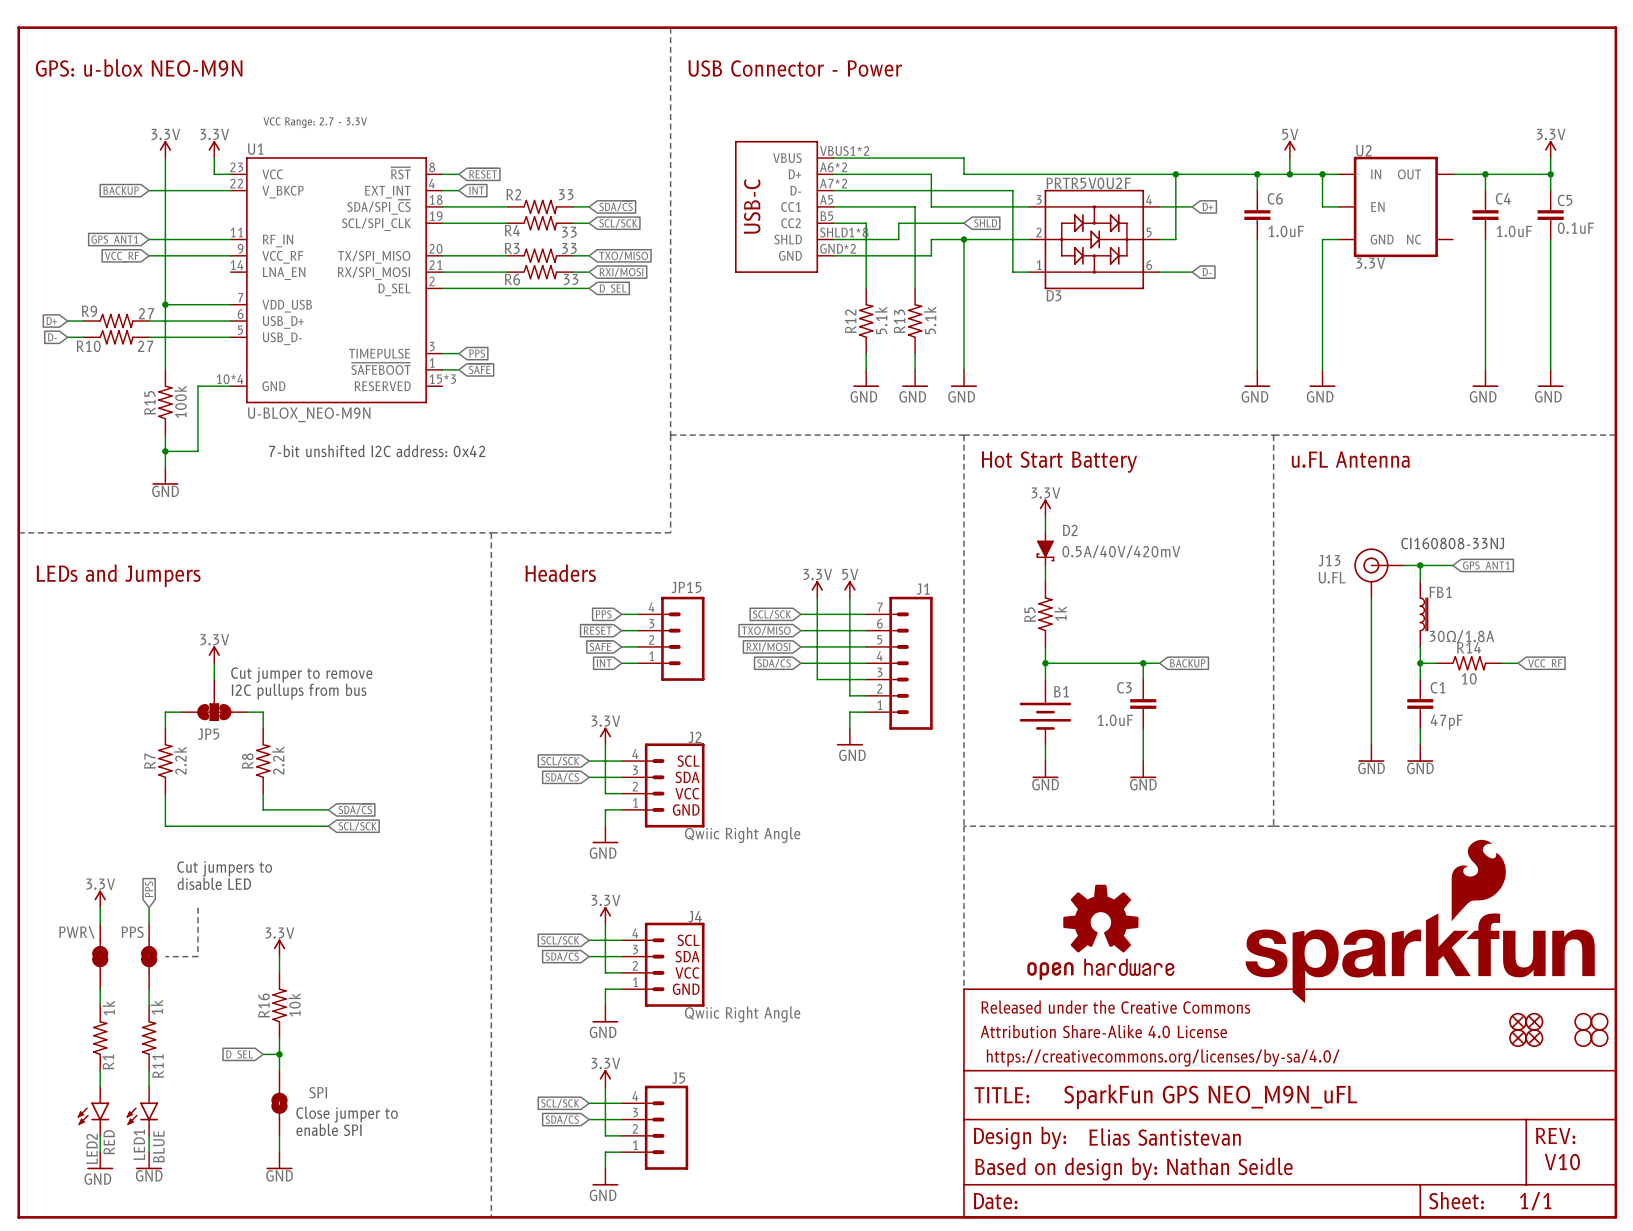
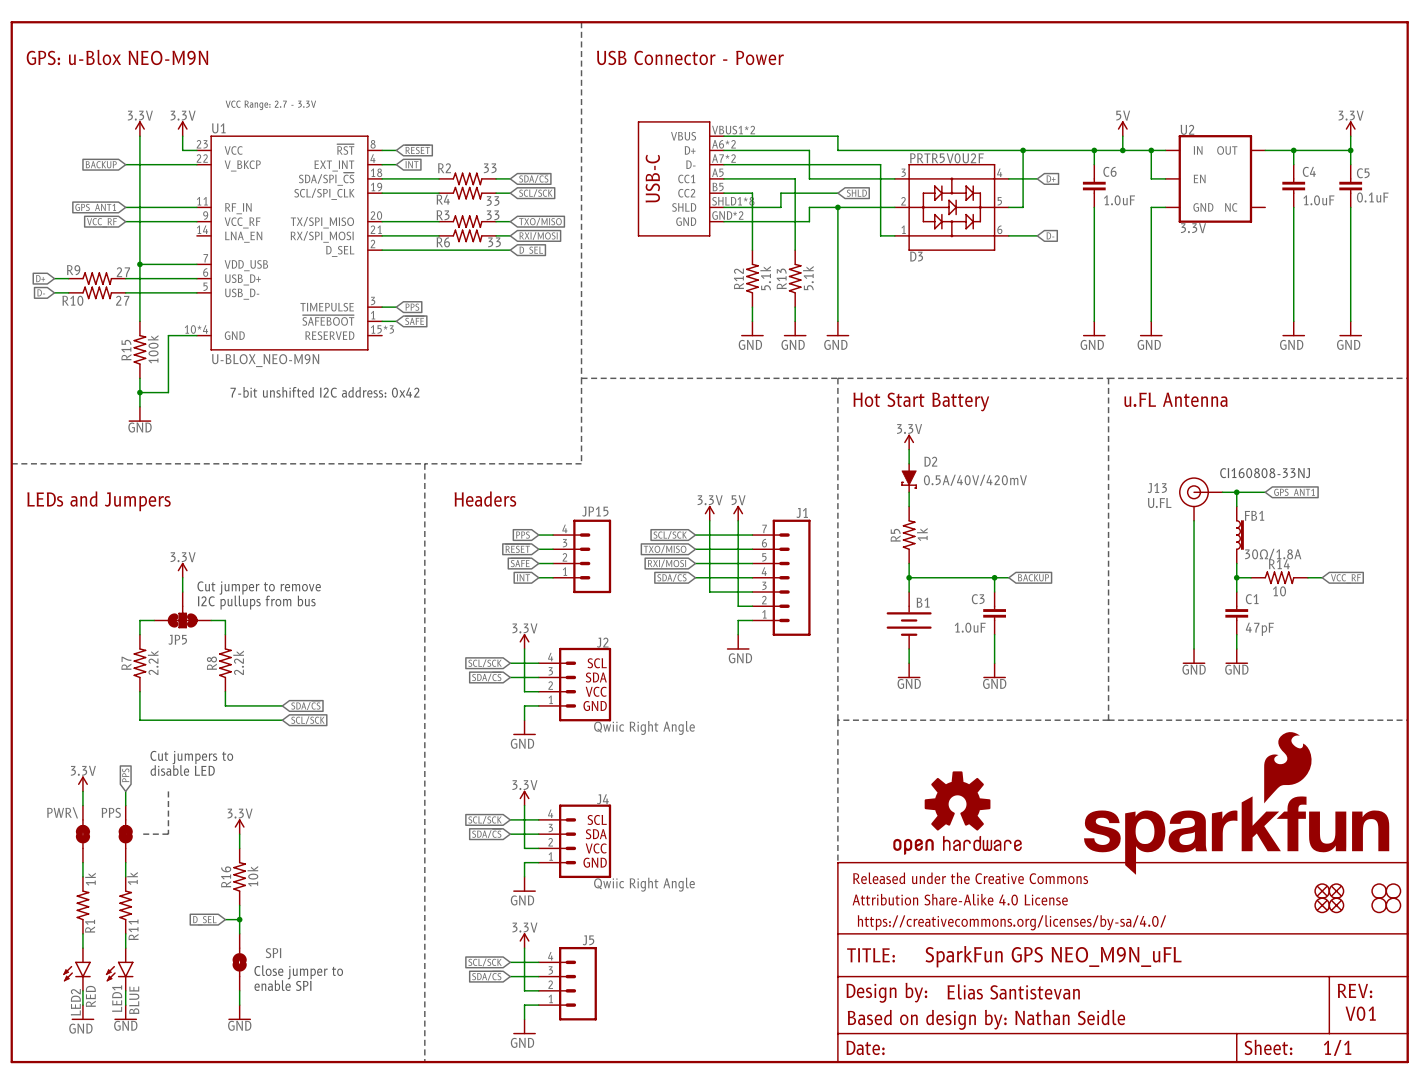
text: GPS: u-blox NEO-M9N (139, 67) -> GPS: u-Blox NEO-M9N (117, 57)
text: V10 (1562, 1162) -> V01 (1360, 1013)

